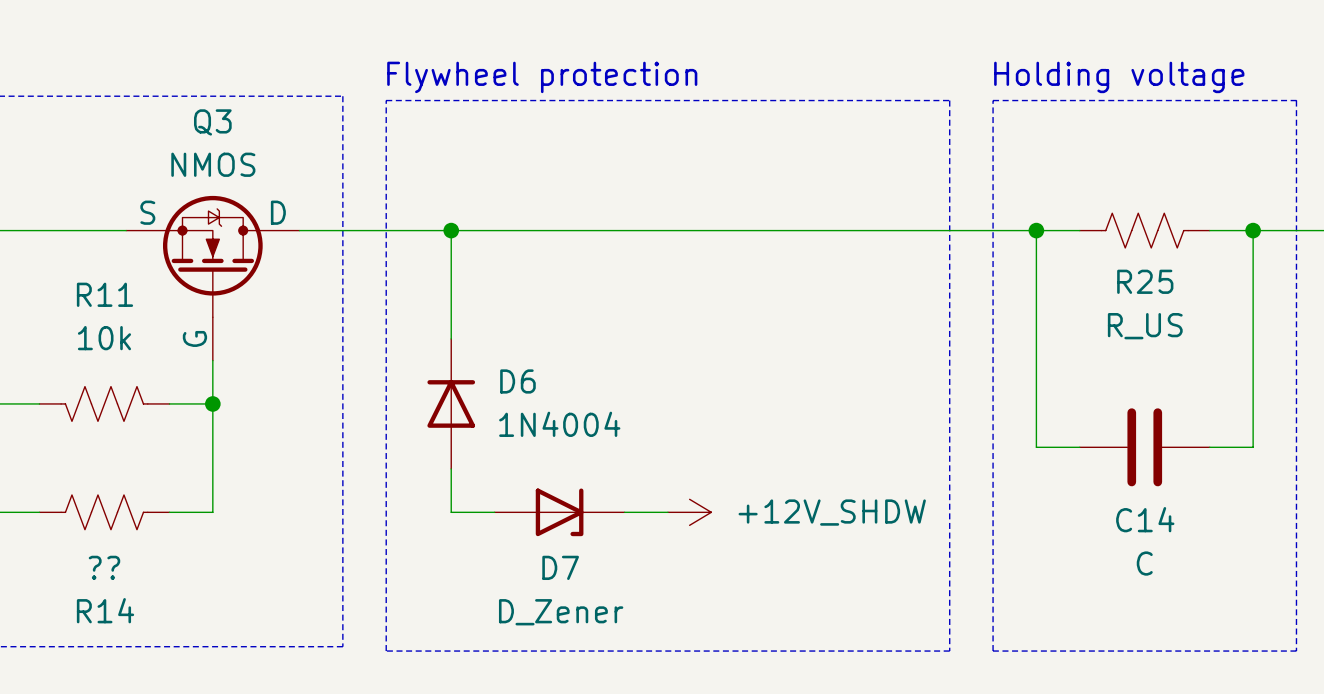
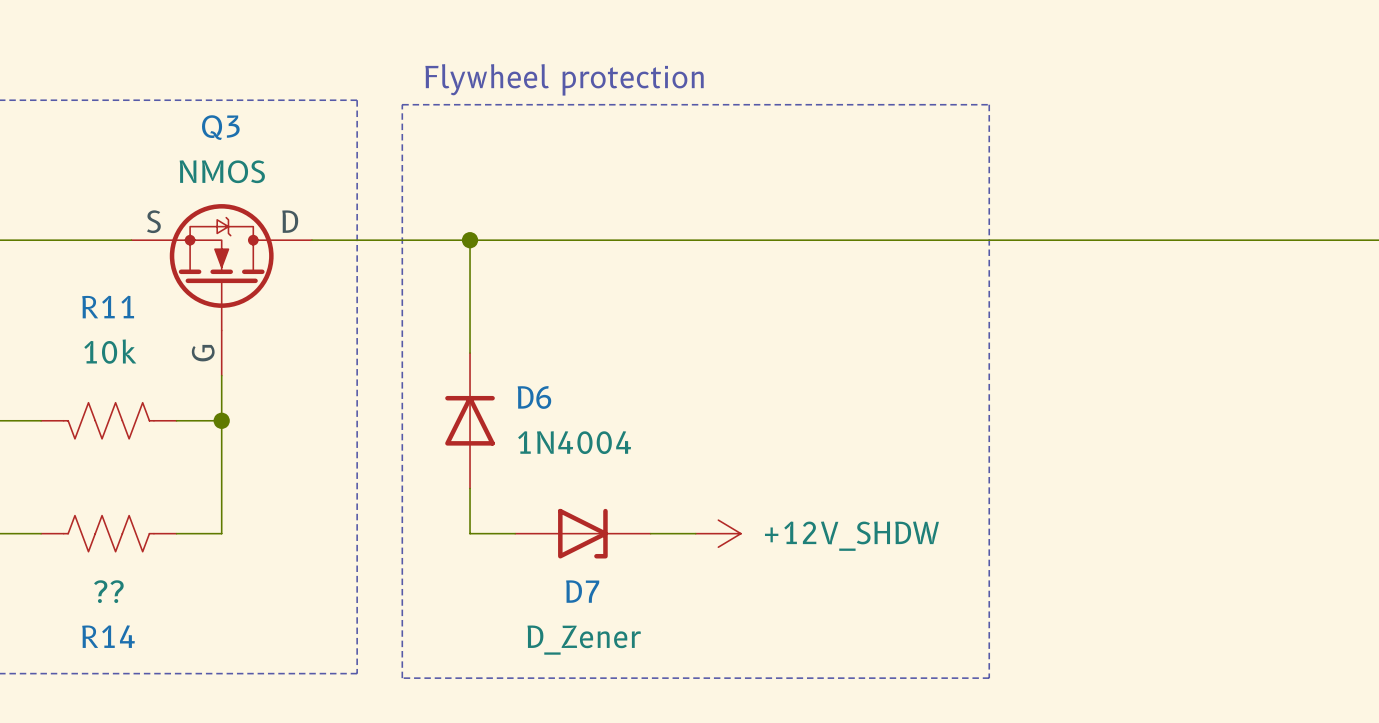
text: Holding voltage (1119, 77) -> none
line: (993, 100) (1296, 100) (1296, 651) (993, 651) (993, 100) -> none
wire: (1036, 230) (1036, 447) (1079, 447) -> none
junction: (1036, 230) -> none
wire: none -> (1124, 240) (1260, 240)
R25: R_US (1144, 230) -> none
wire: (1253, 230) (1253, 447) (1209, 447) -> none
junction: (1253, 230) -> none
C14: C (1144, 447) -> none

